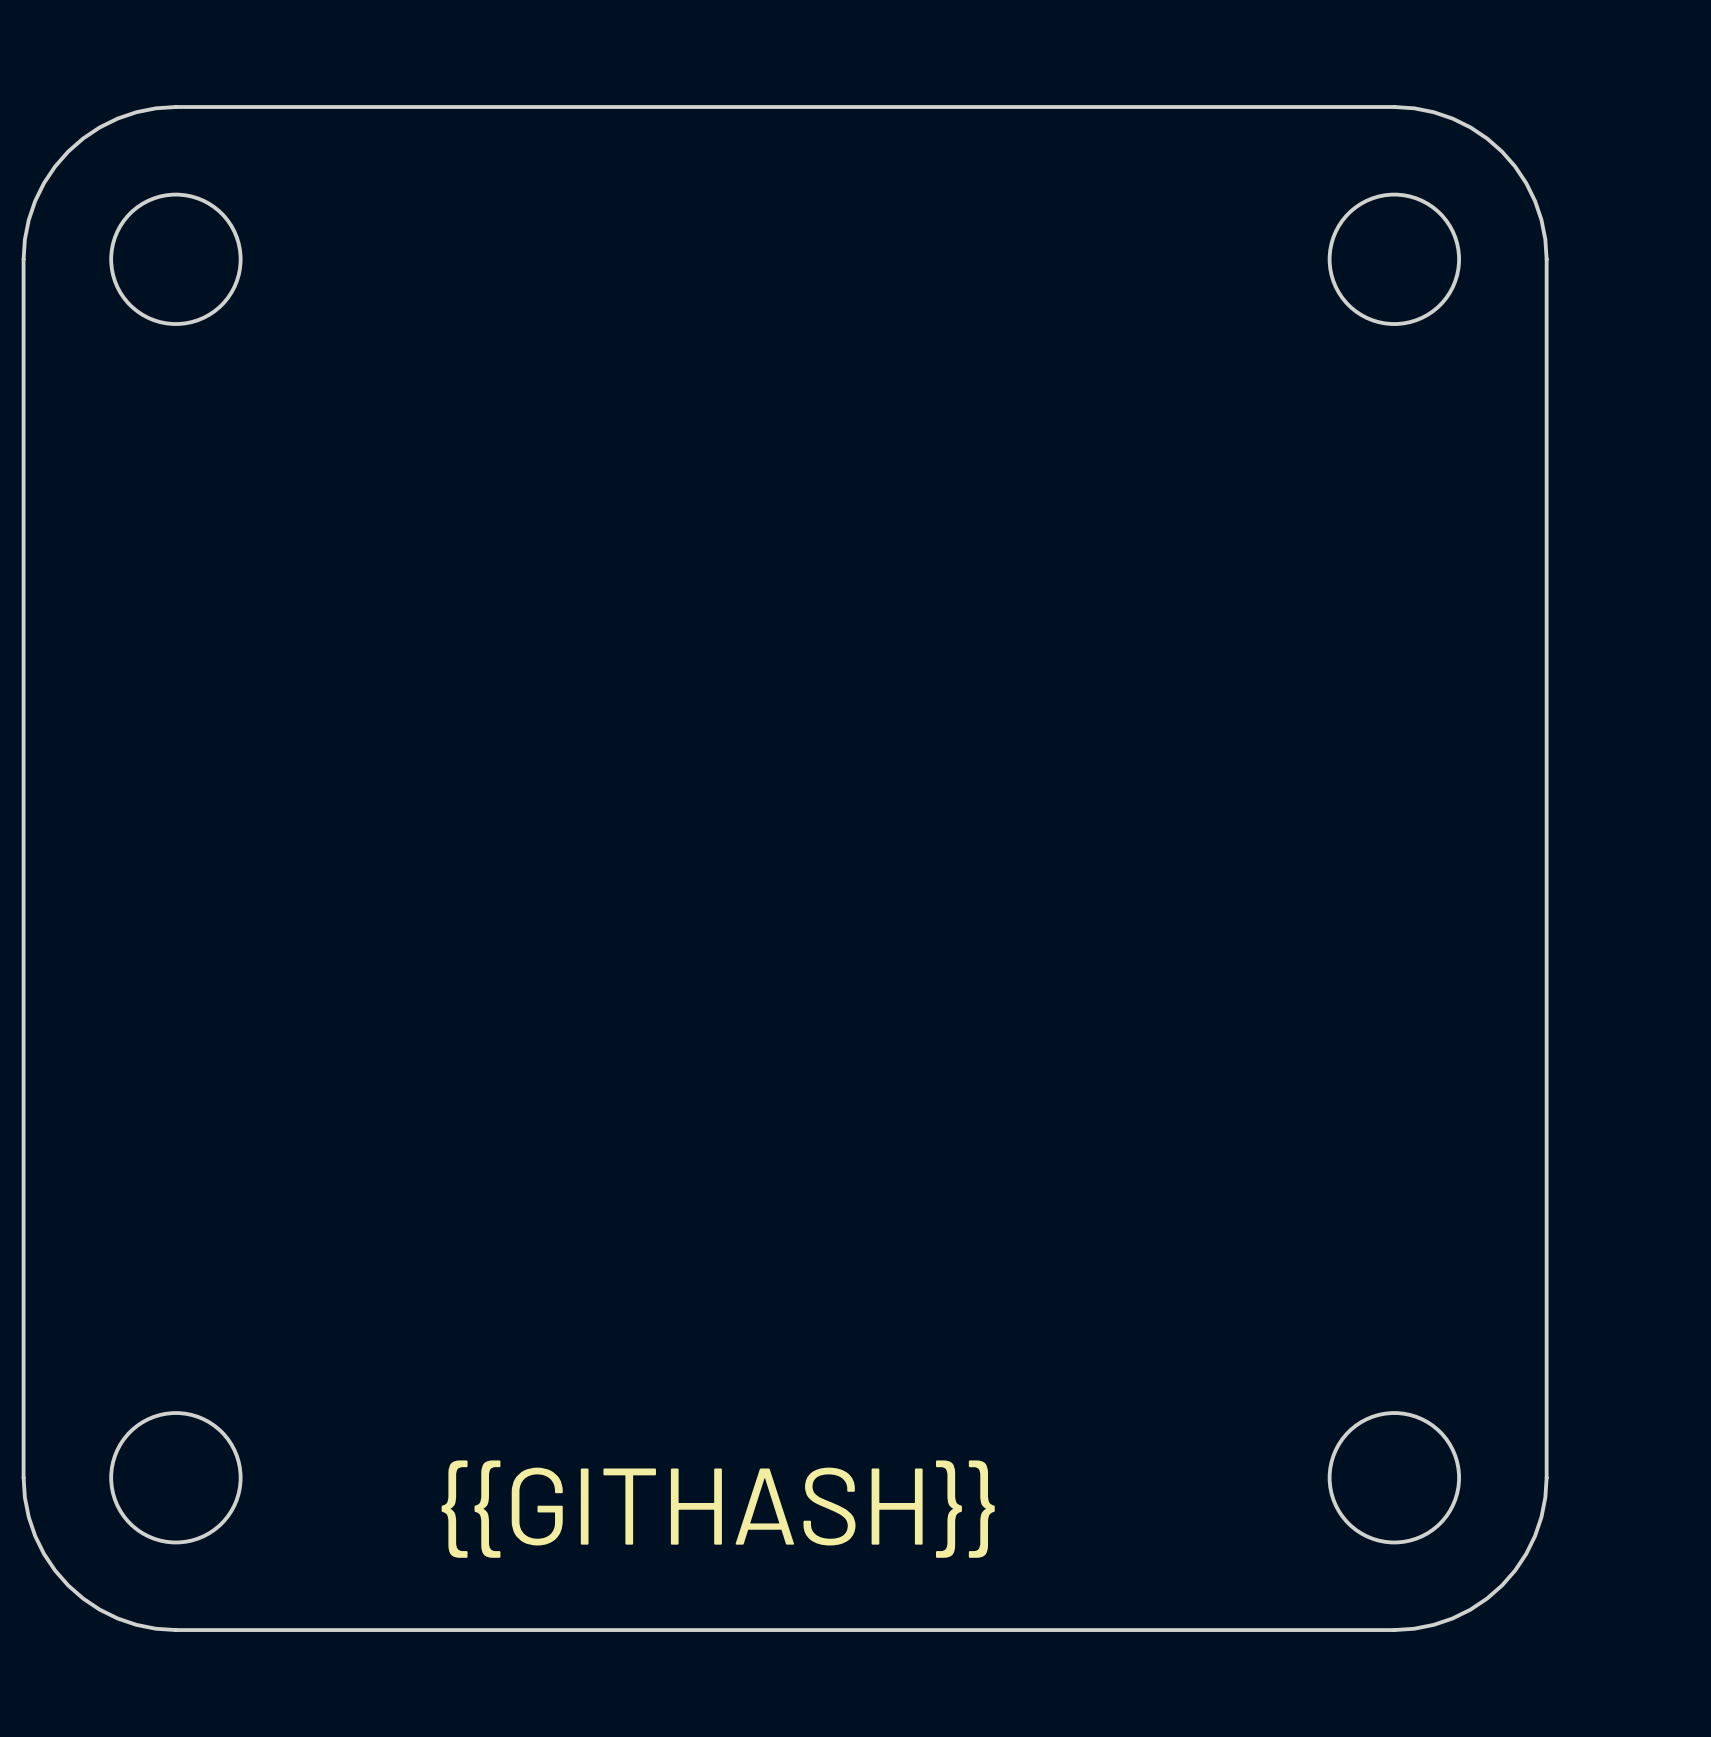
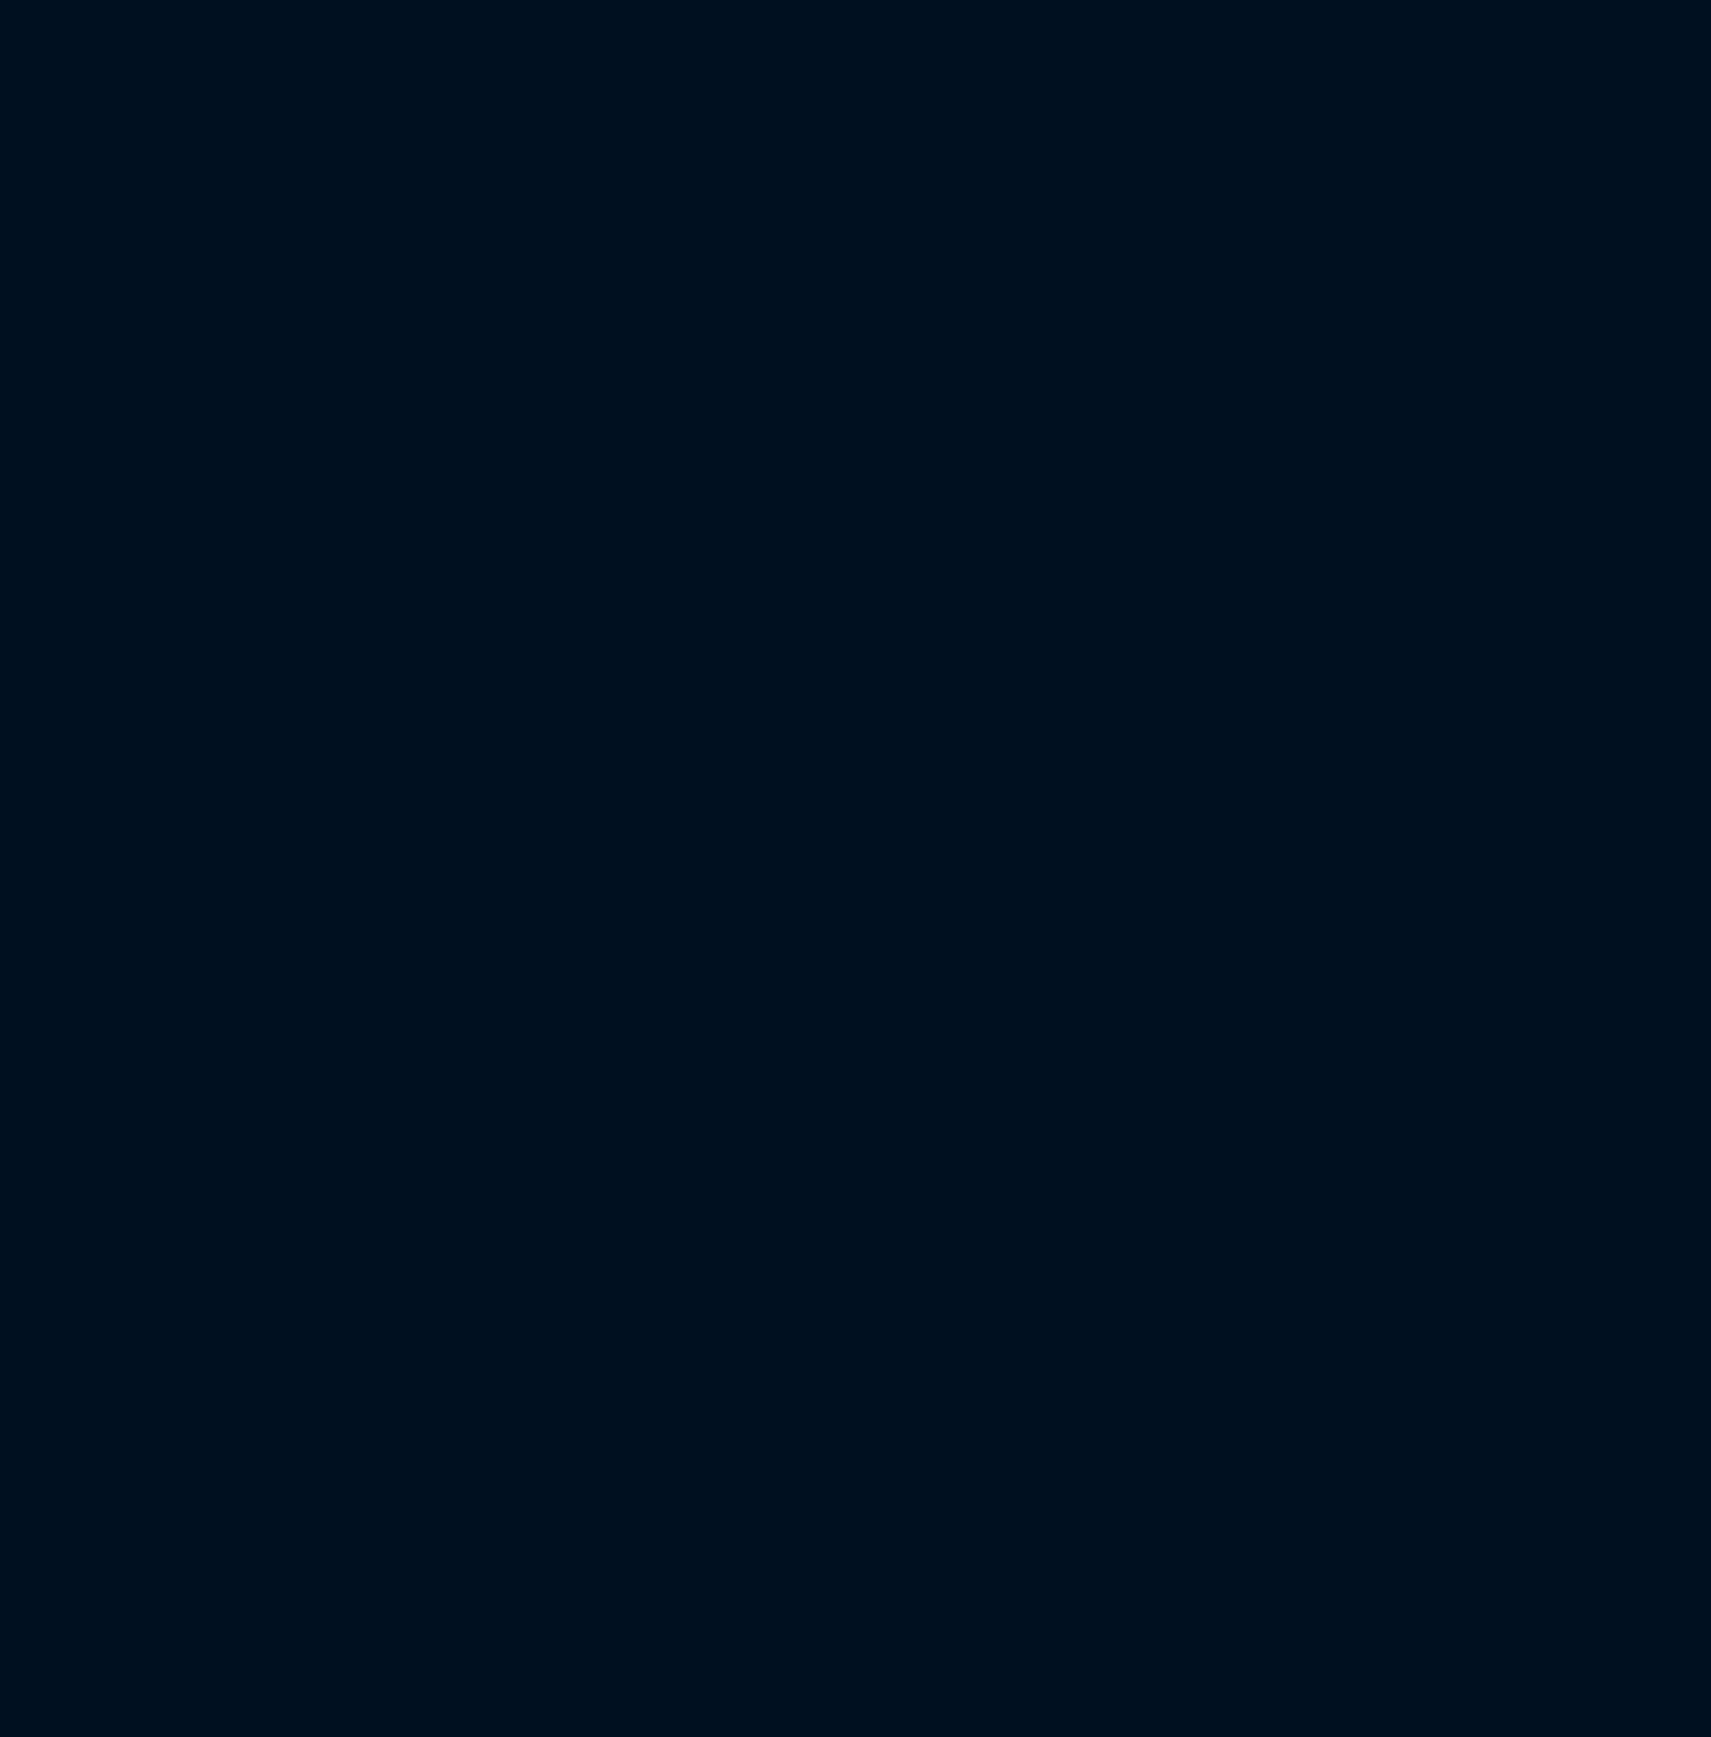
board edge: (175, 107) (1394, 107) (1433, 112) (1452, 118) (1470, 127) (1502, 151) (1526, 183) (1535, 201) (1545, 239) (1546, 259) (1546, 1477) (1541, 1517) (1535, 1536) (1526, 1553) (1502, 1585) (1487, 1598) (1452, 1618) (1433, 1624) (1394, 1630) (175, 1630) (136, 1624) (117, 1618) (83, 1598) (68, 1585) (55, 1570) (35, 1536) (28, 1517) (23, 1477) (24, 239) (35, 201) (44, 183) (68, 151) (83, 138) (117, 118) (136, 112) (175, 107) -> none
round board edge: [109, 192, 243, 326] -> none
round board edge: [1327, 192, 1461, 326] -> none
round board edge: [109, 1411, 243, 1545] -> none
round board edge: [1327, 1411, 1461, 1545] -> none
text: {{GITHASH}} (718, 1509) -> none

